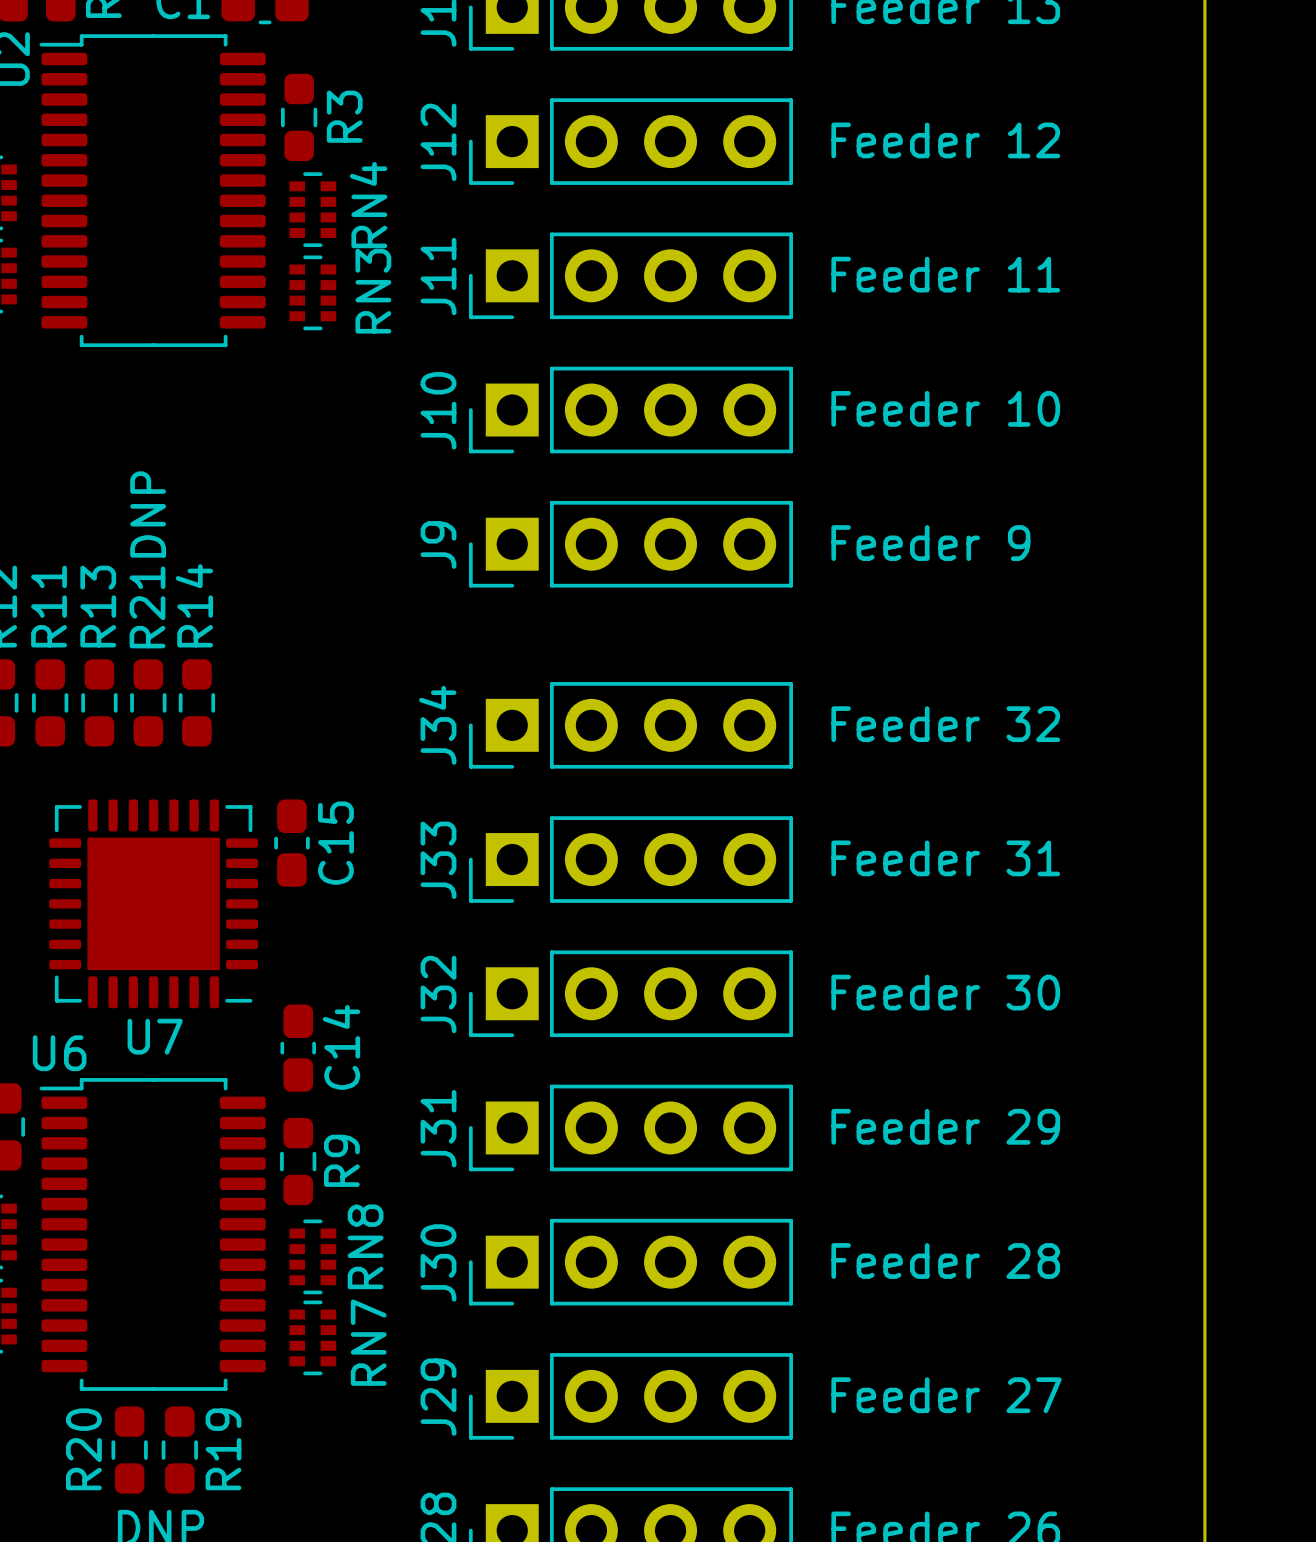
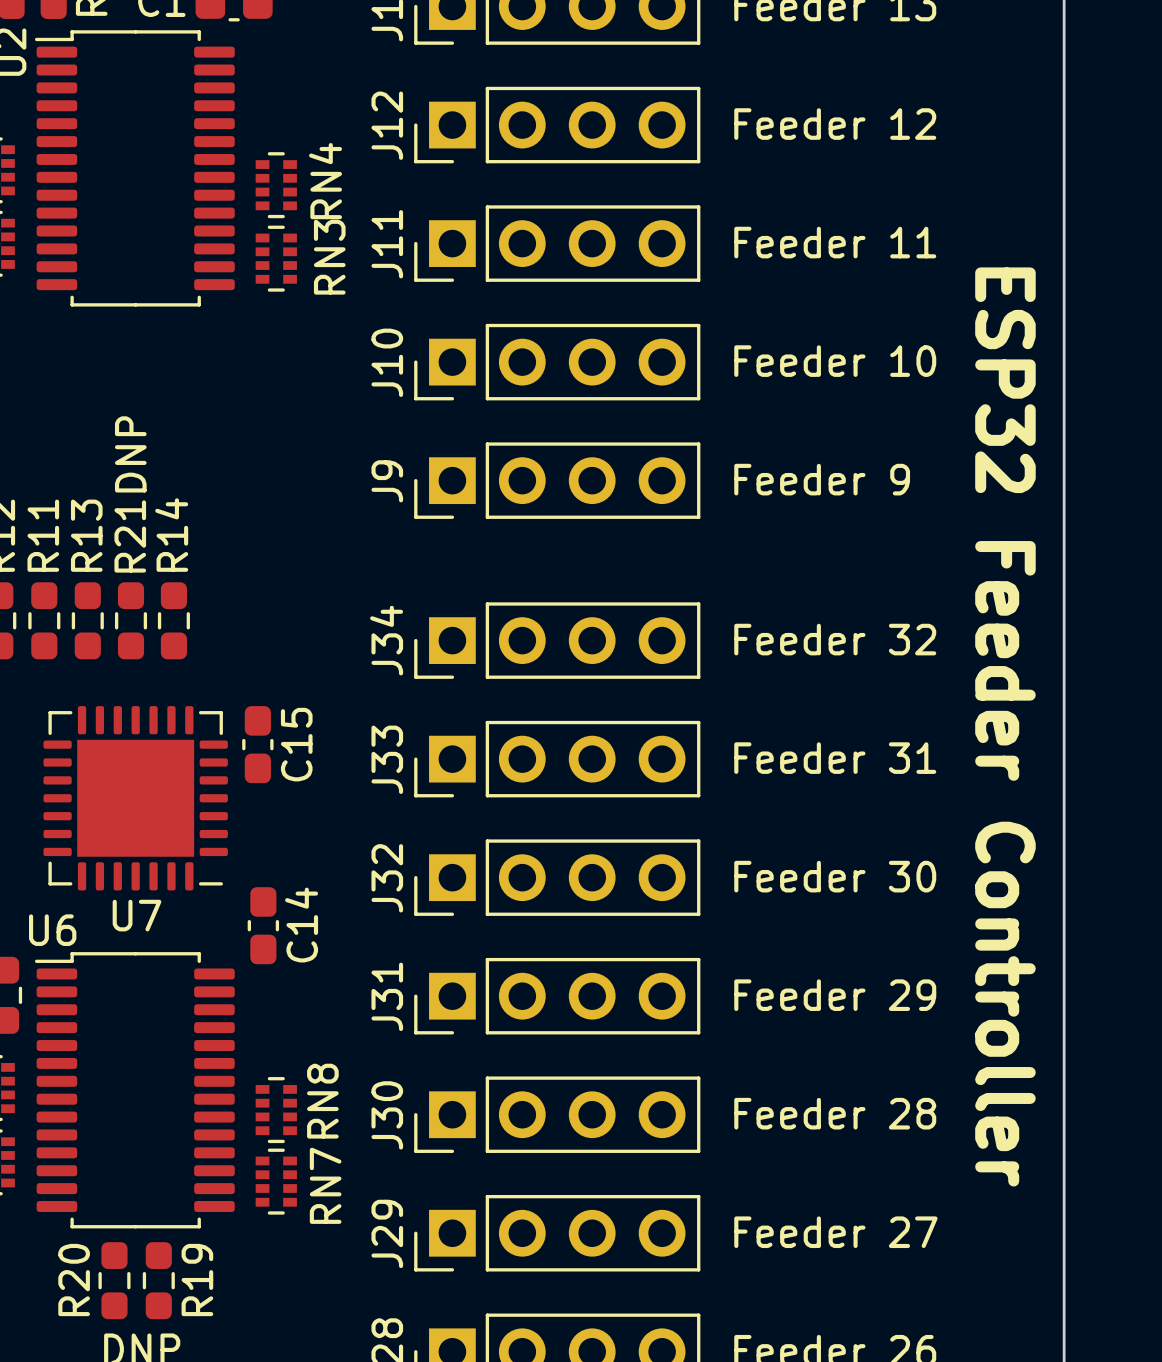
R3: (299, 117) -> none
text: none -> ESP32 Feeder Controller (1005, 726)
R9: (298, 1161) -> none

